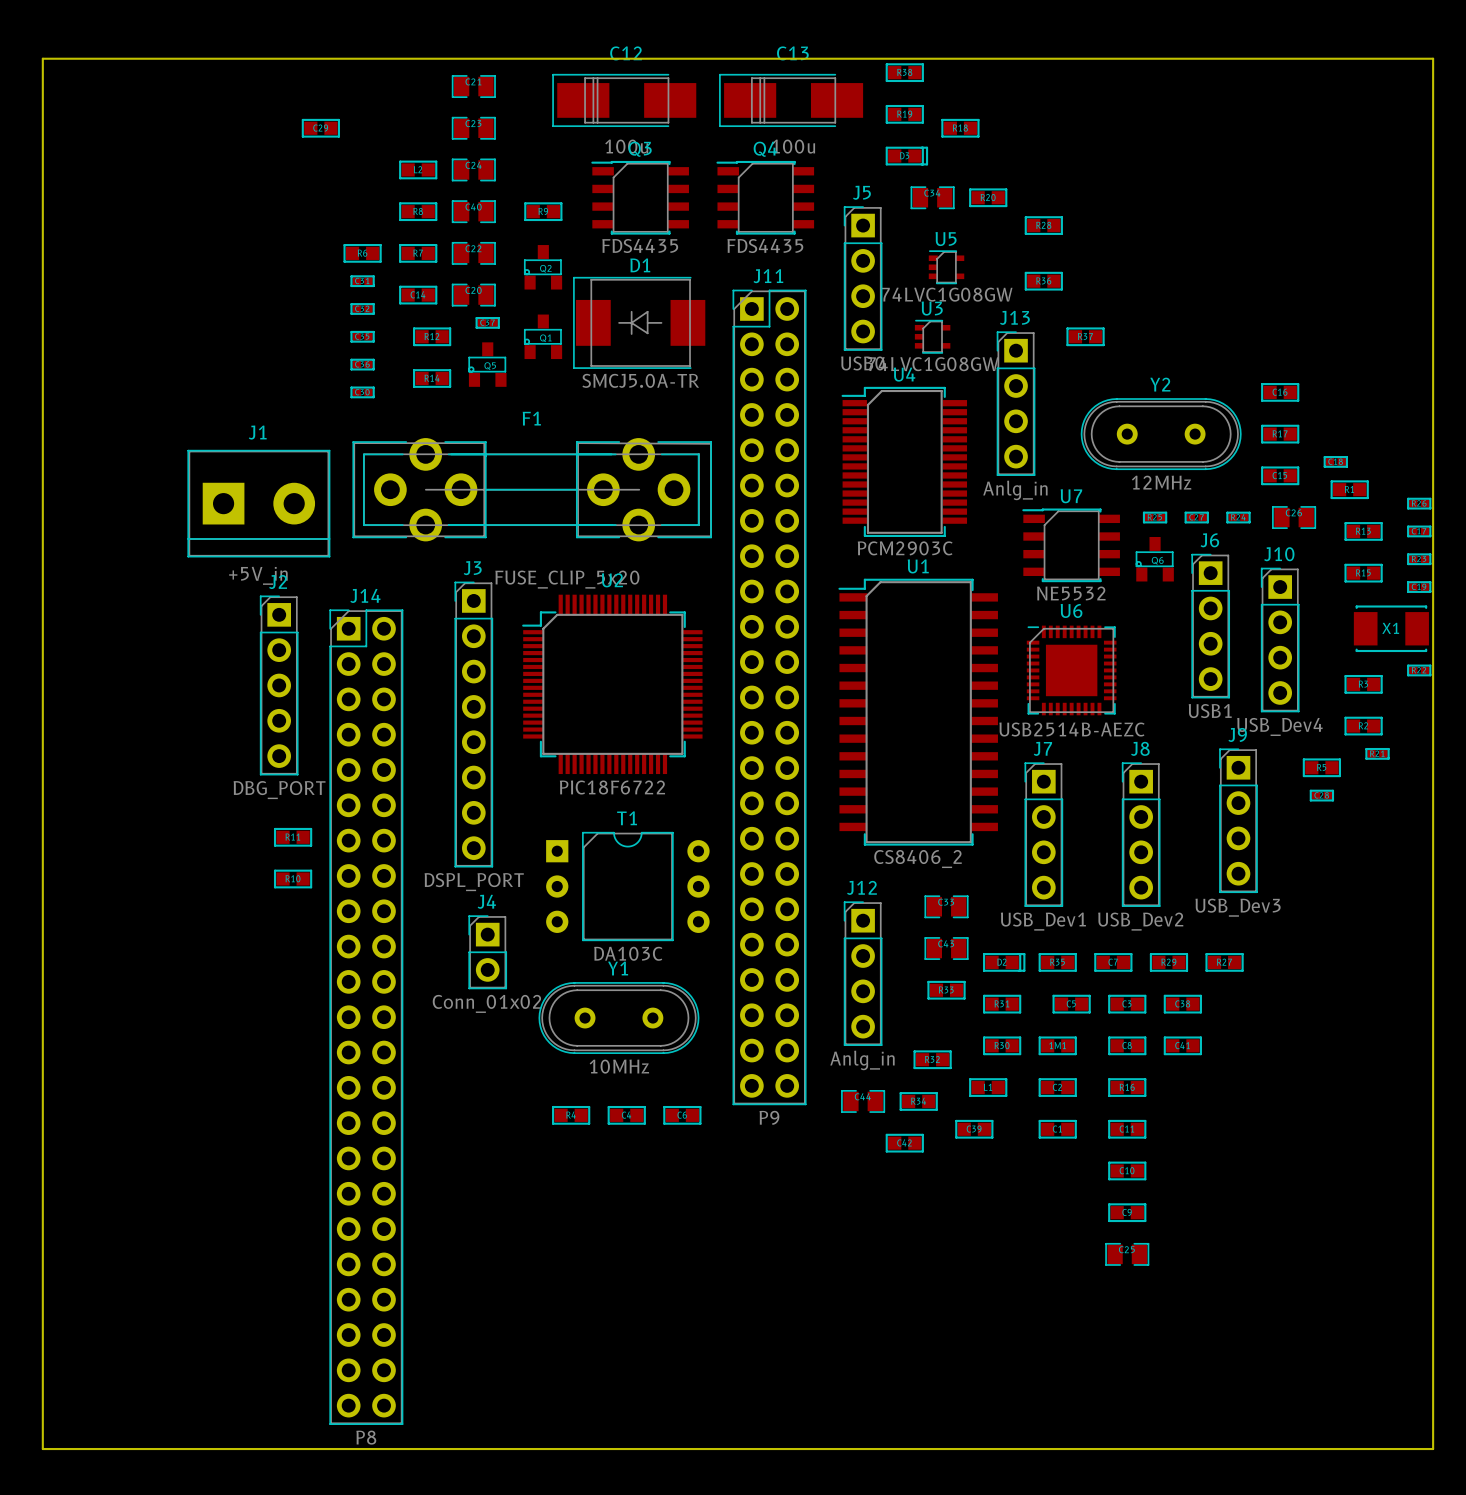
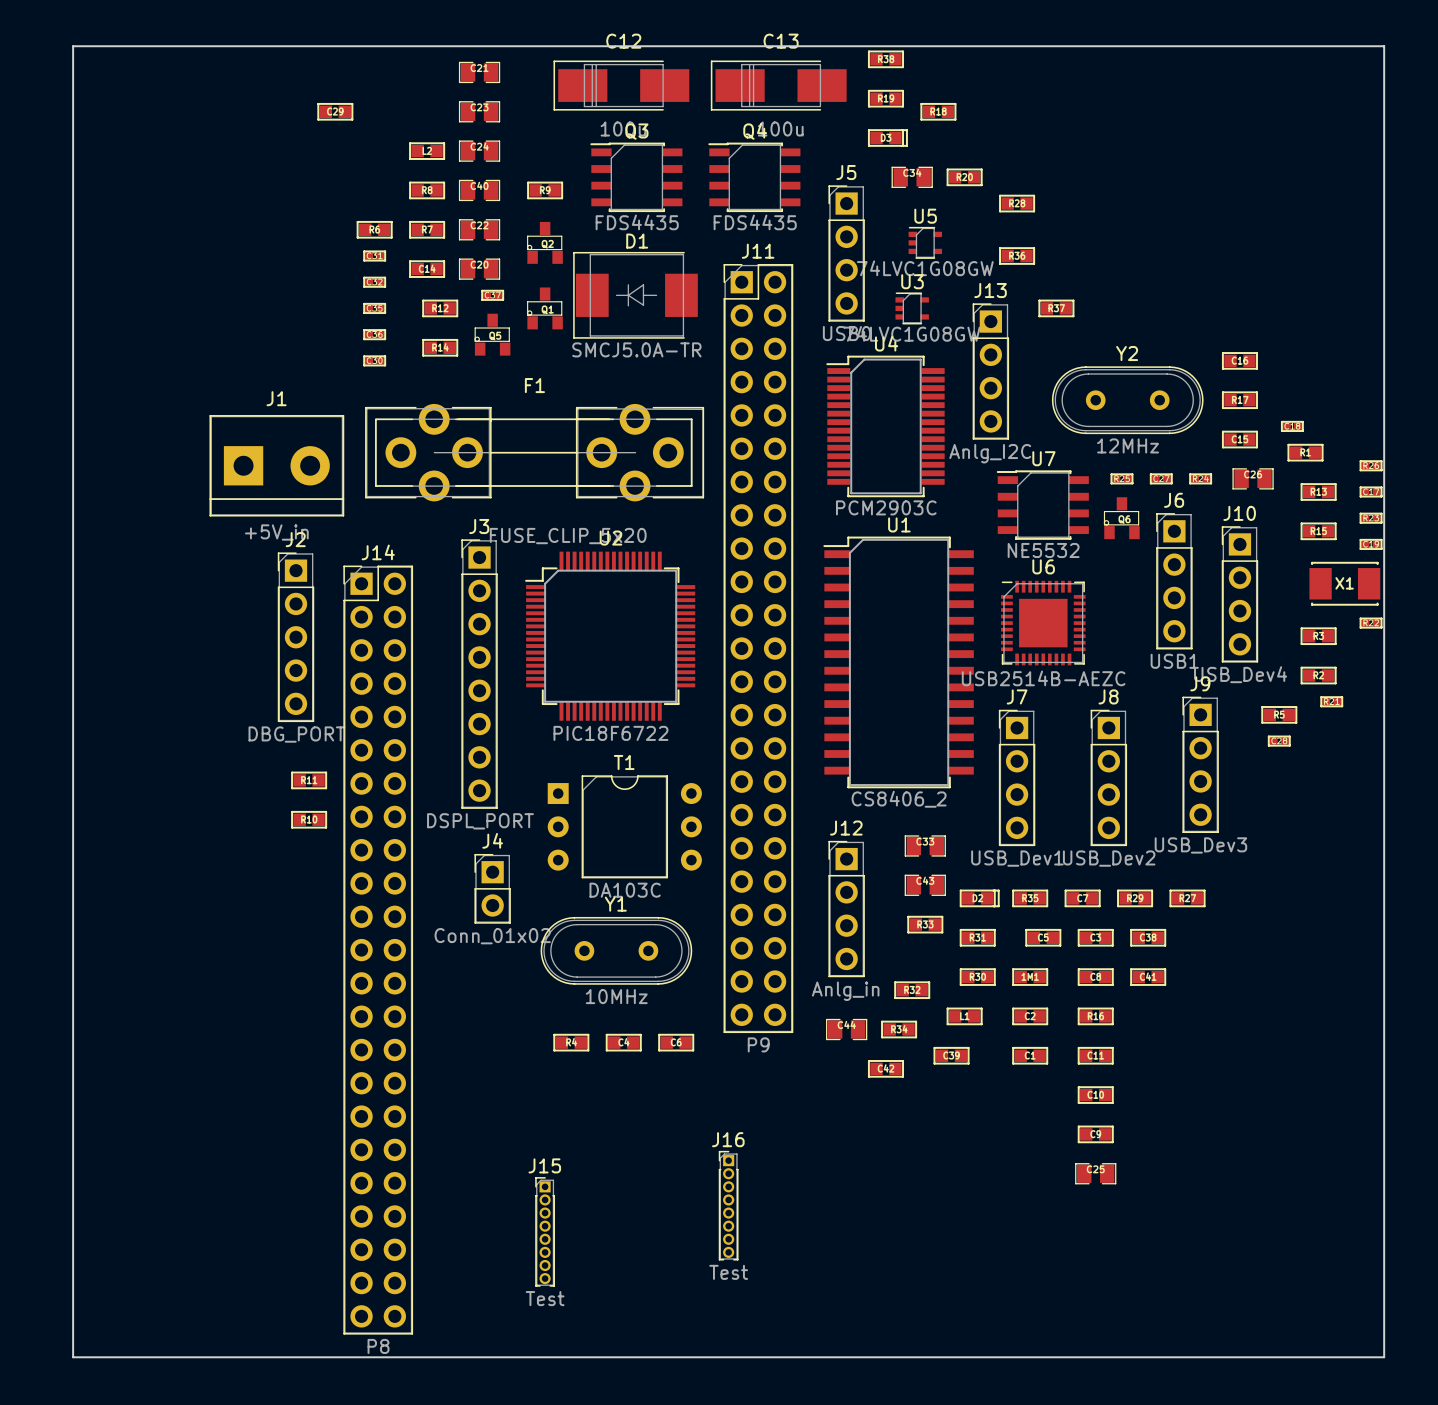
J13 value: Anlg_in (1015, 490) -> Anlg_I2C (990, 453)
J16: none -> Test (728, 1205)
J15: none -> Test (545, 1231)

